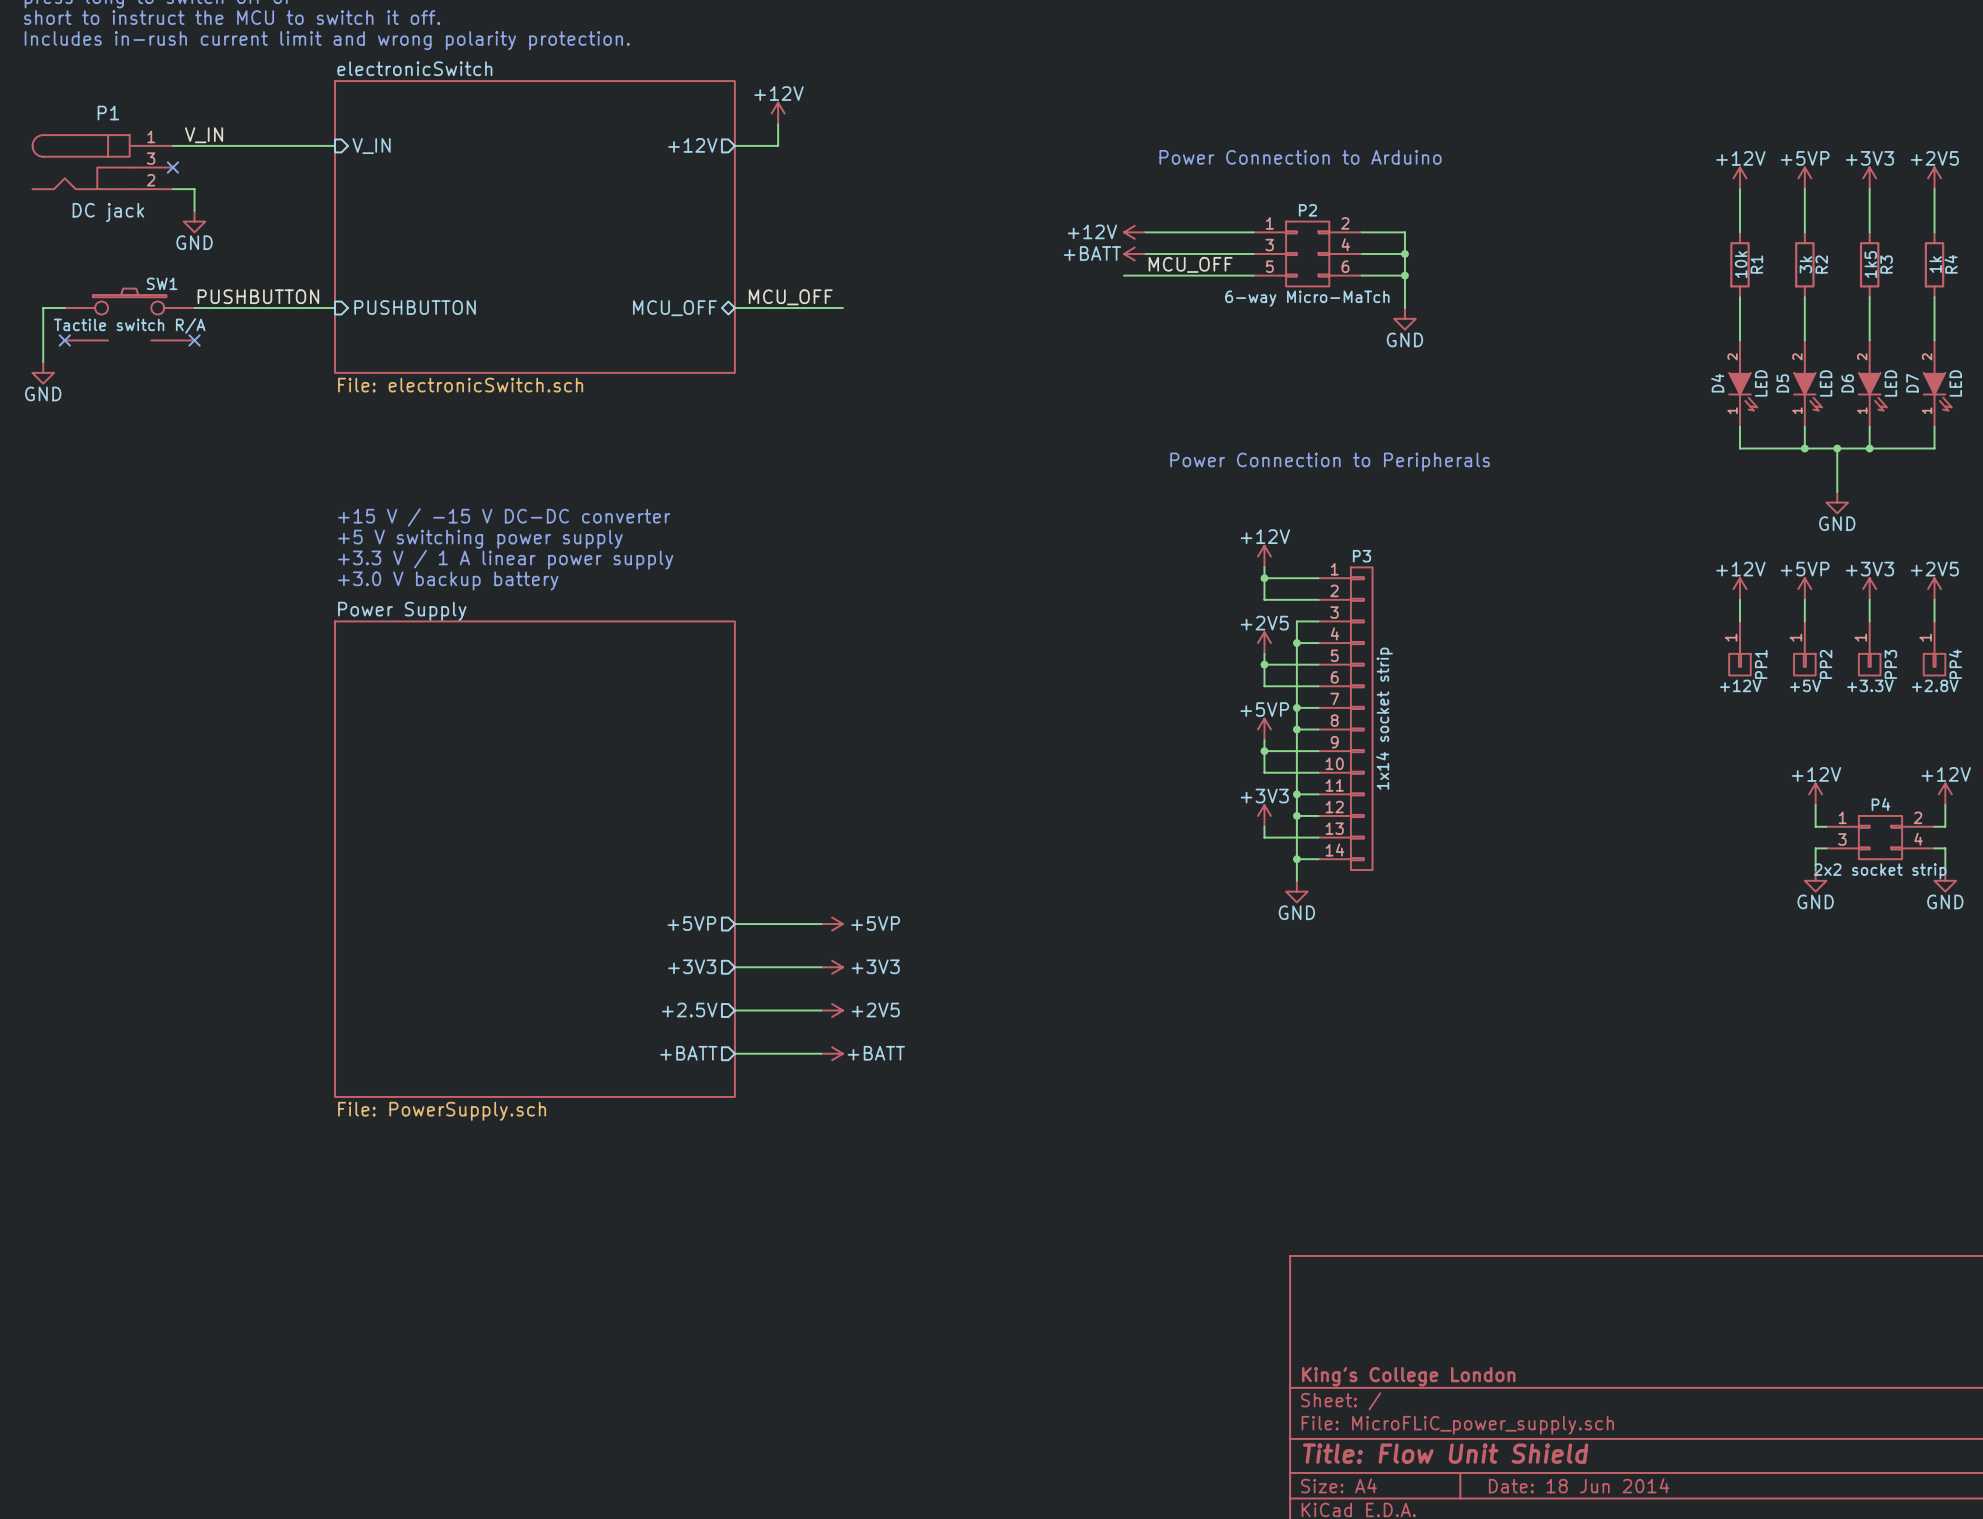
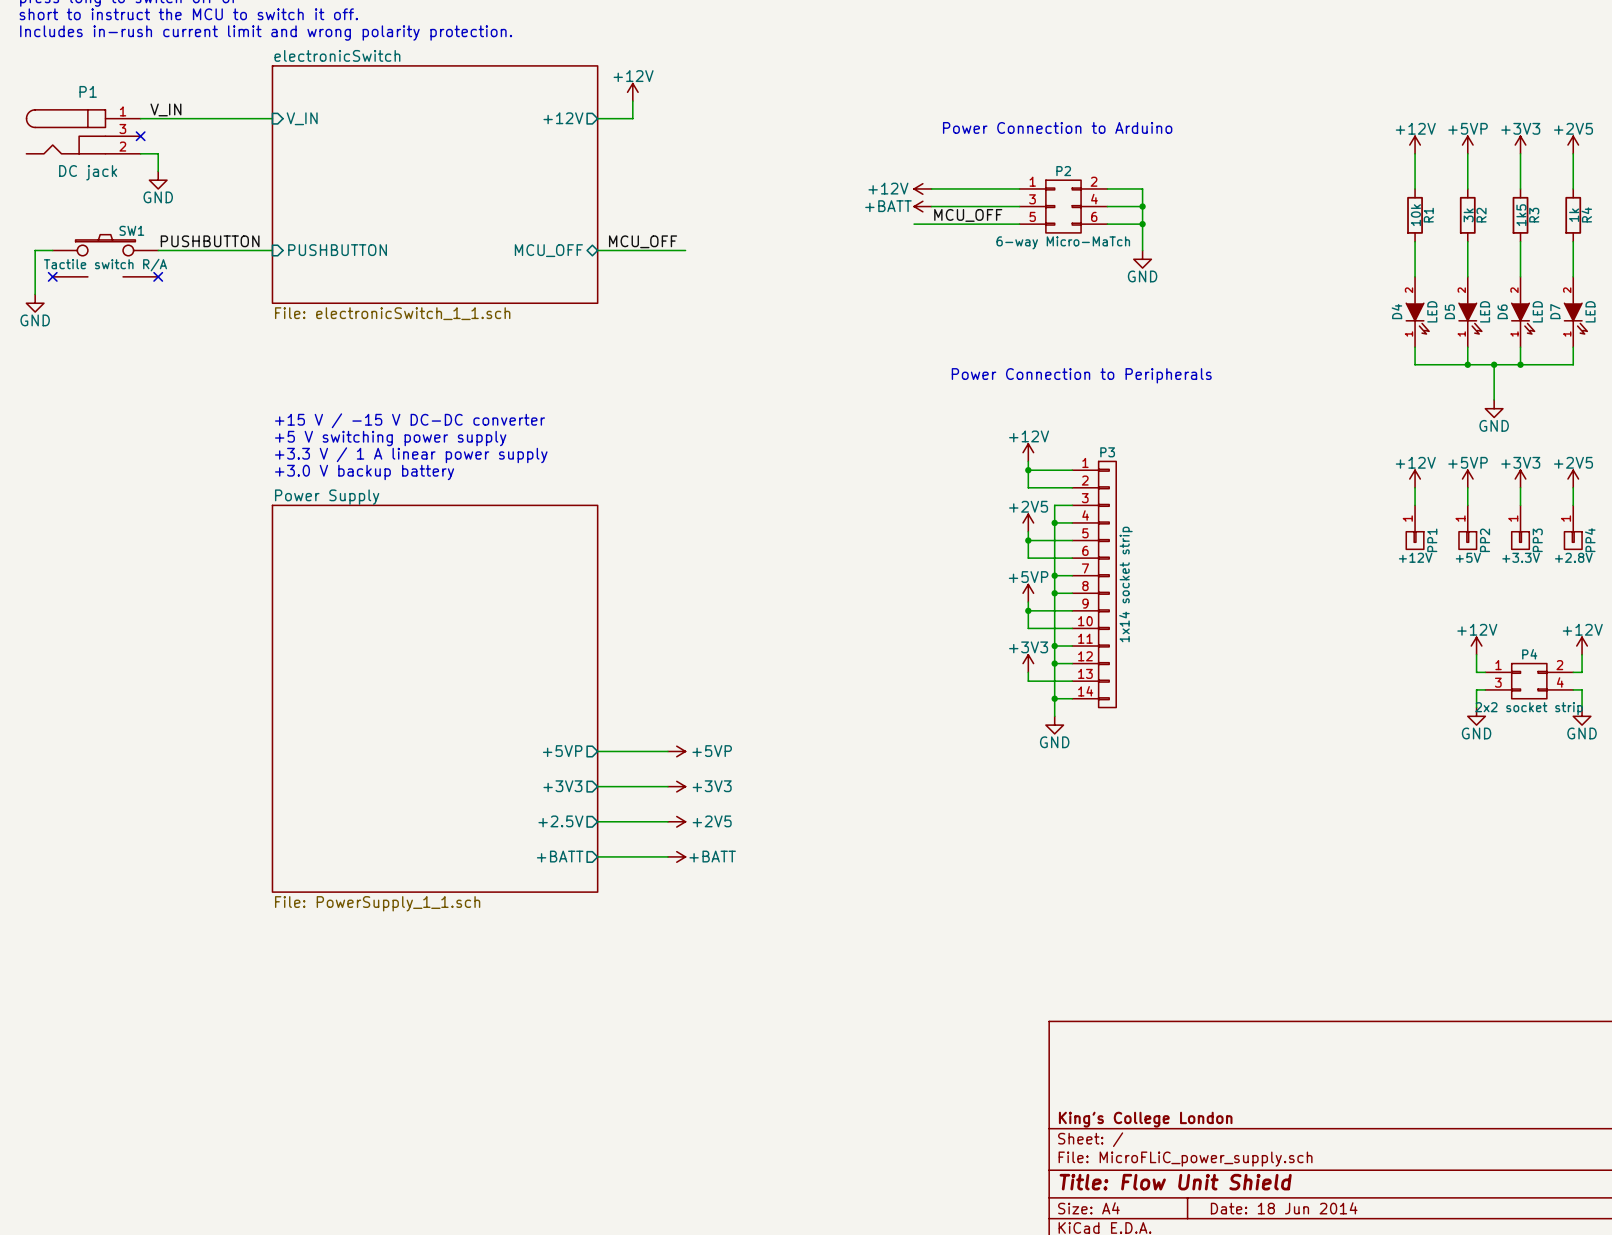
sheet electronicSwitch value: File: electronicSwitch.sch (460, 385) -> File: electronicSwitch_1_1.sch (392, 313)
sheet Power Supply value: File: PowerSupply.sch (442, 1111) -> File: PowerSupply_1_1.sch (377, 903)

